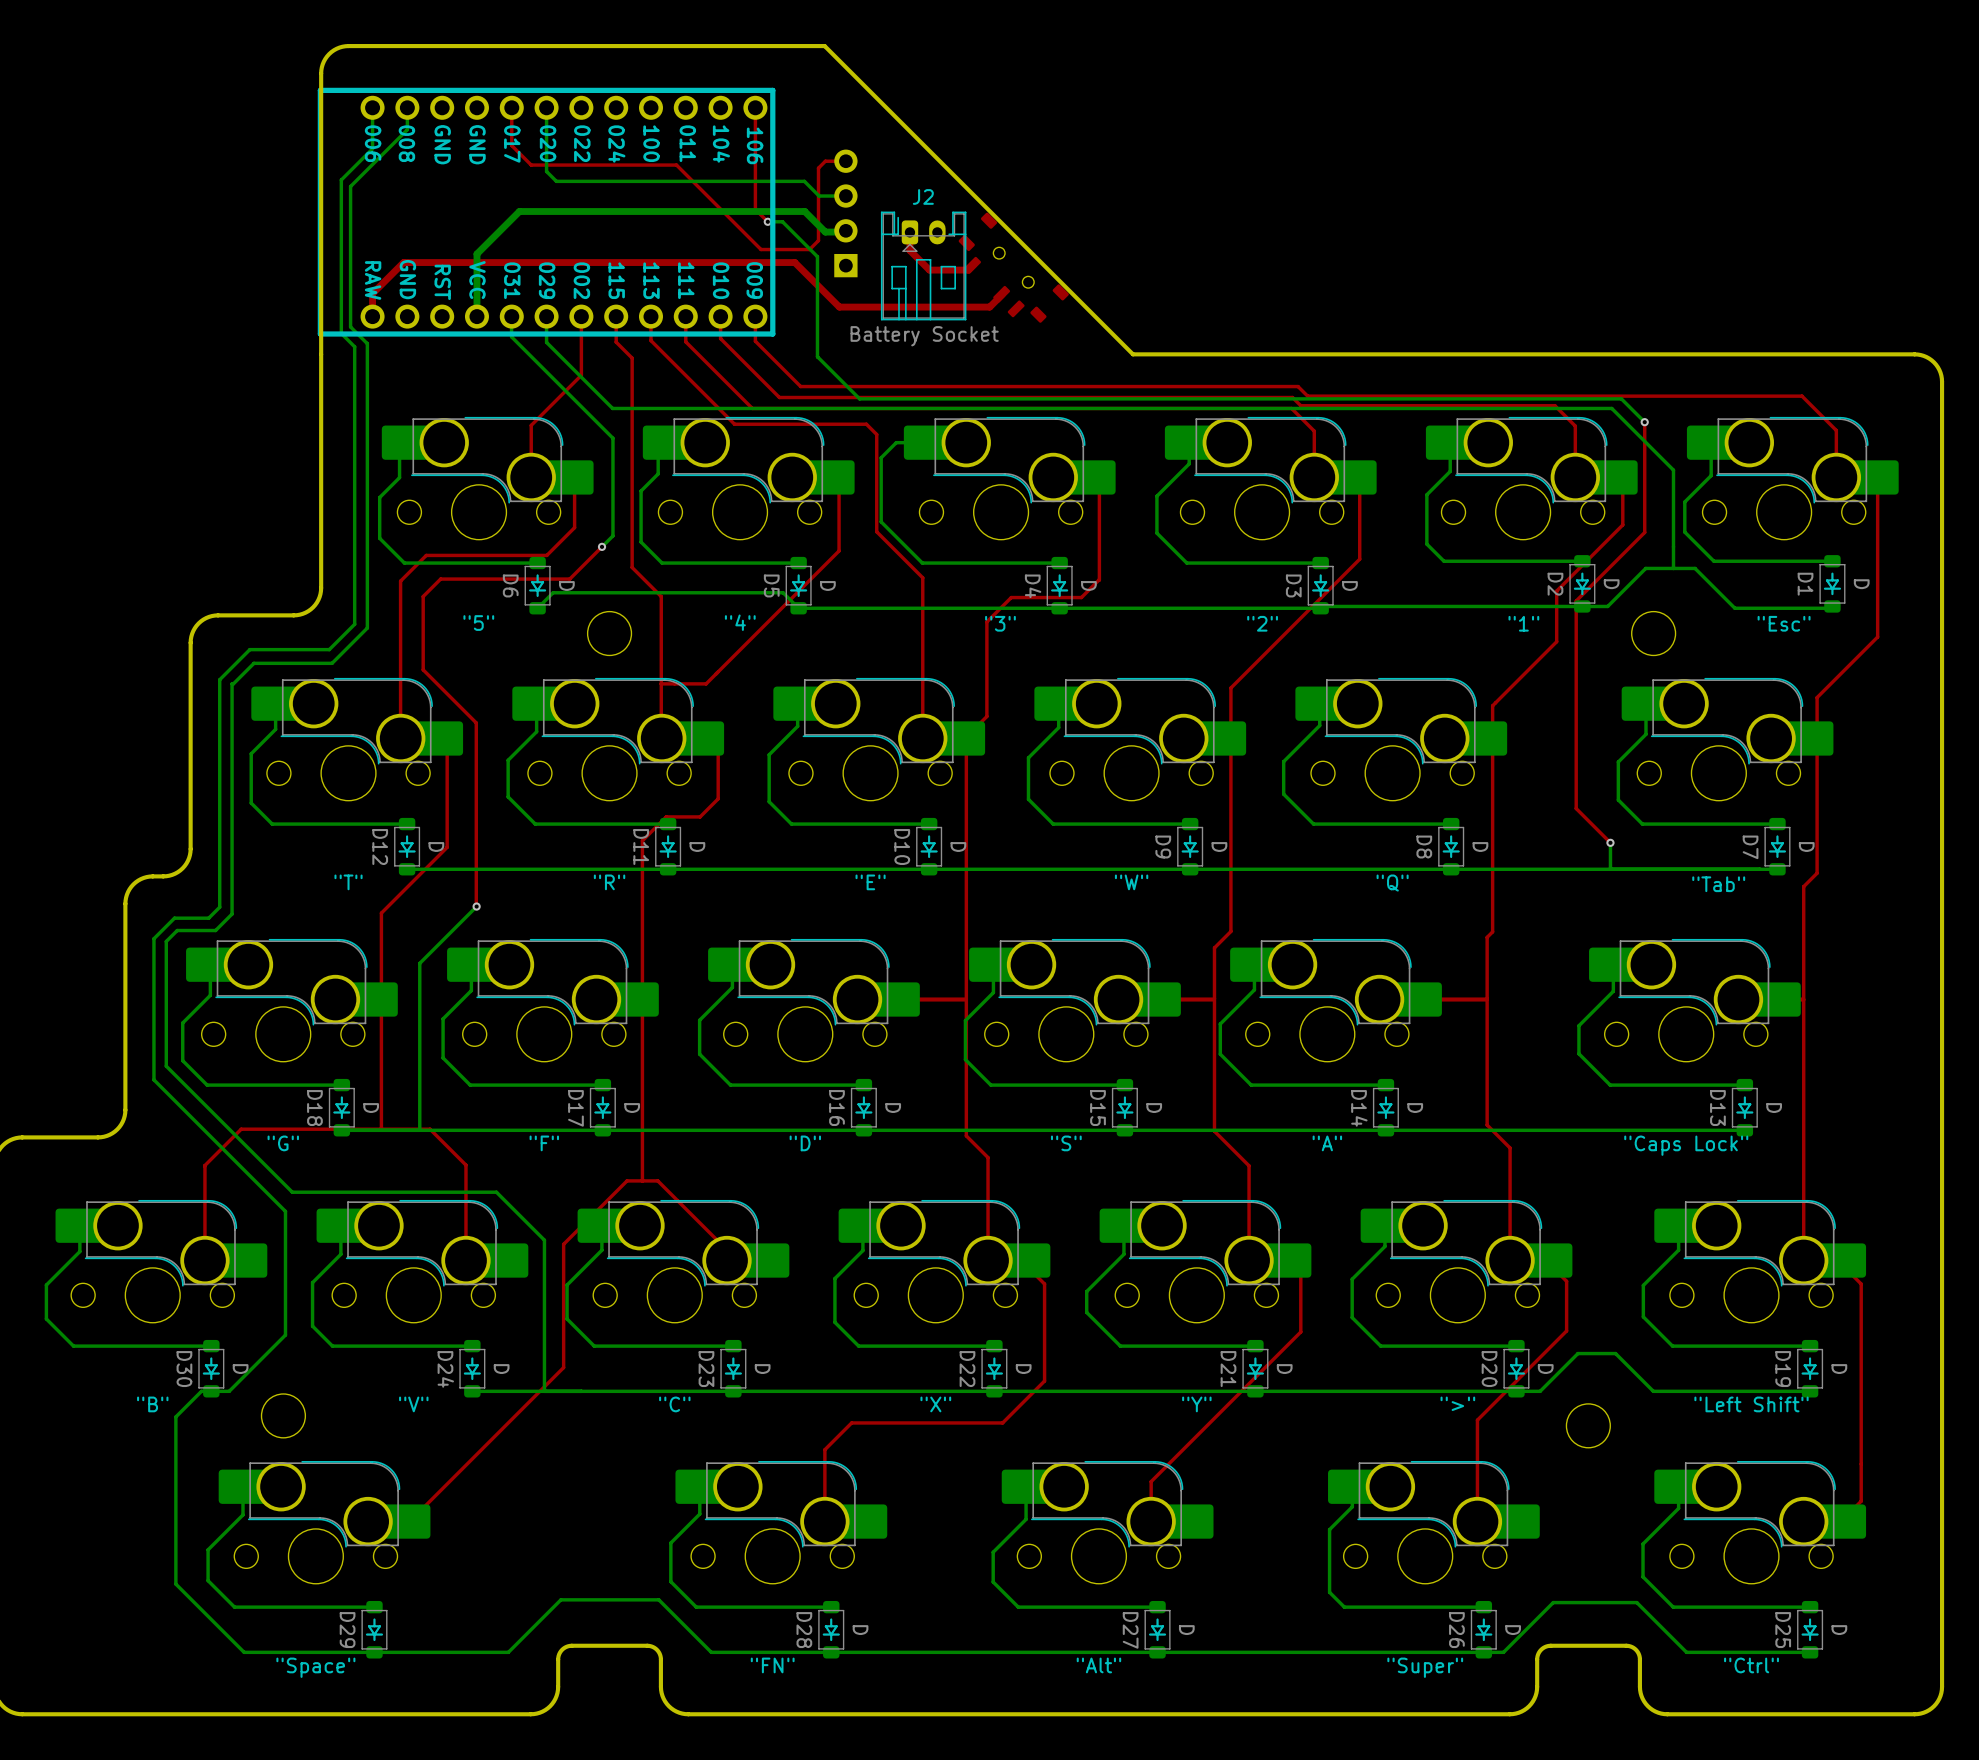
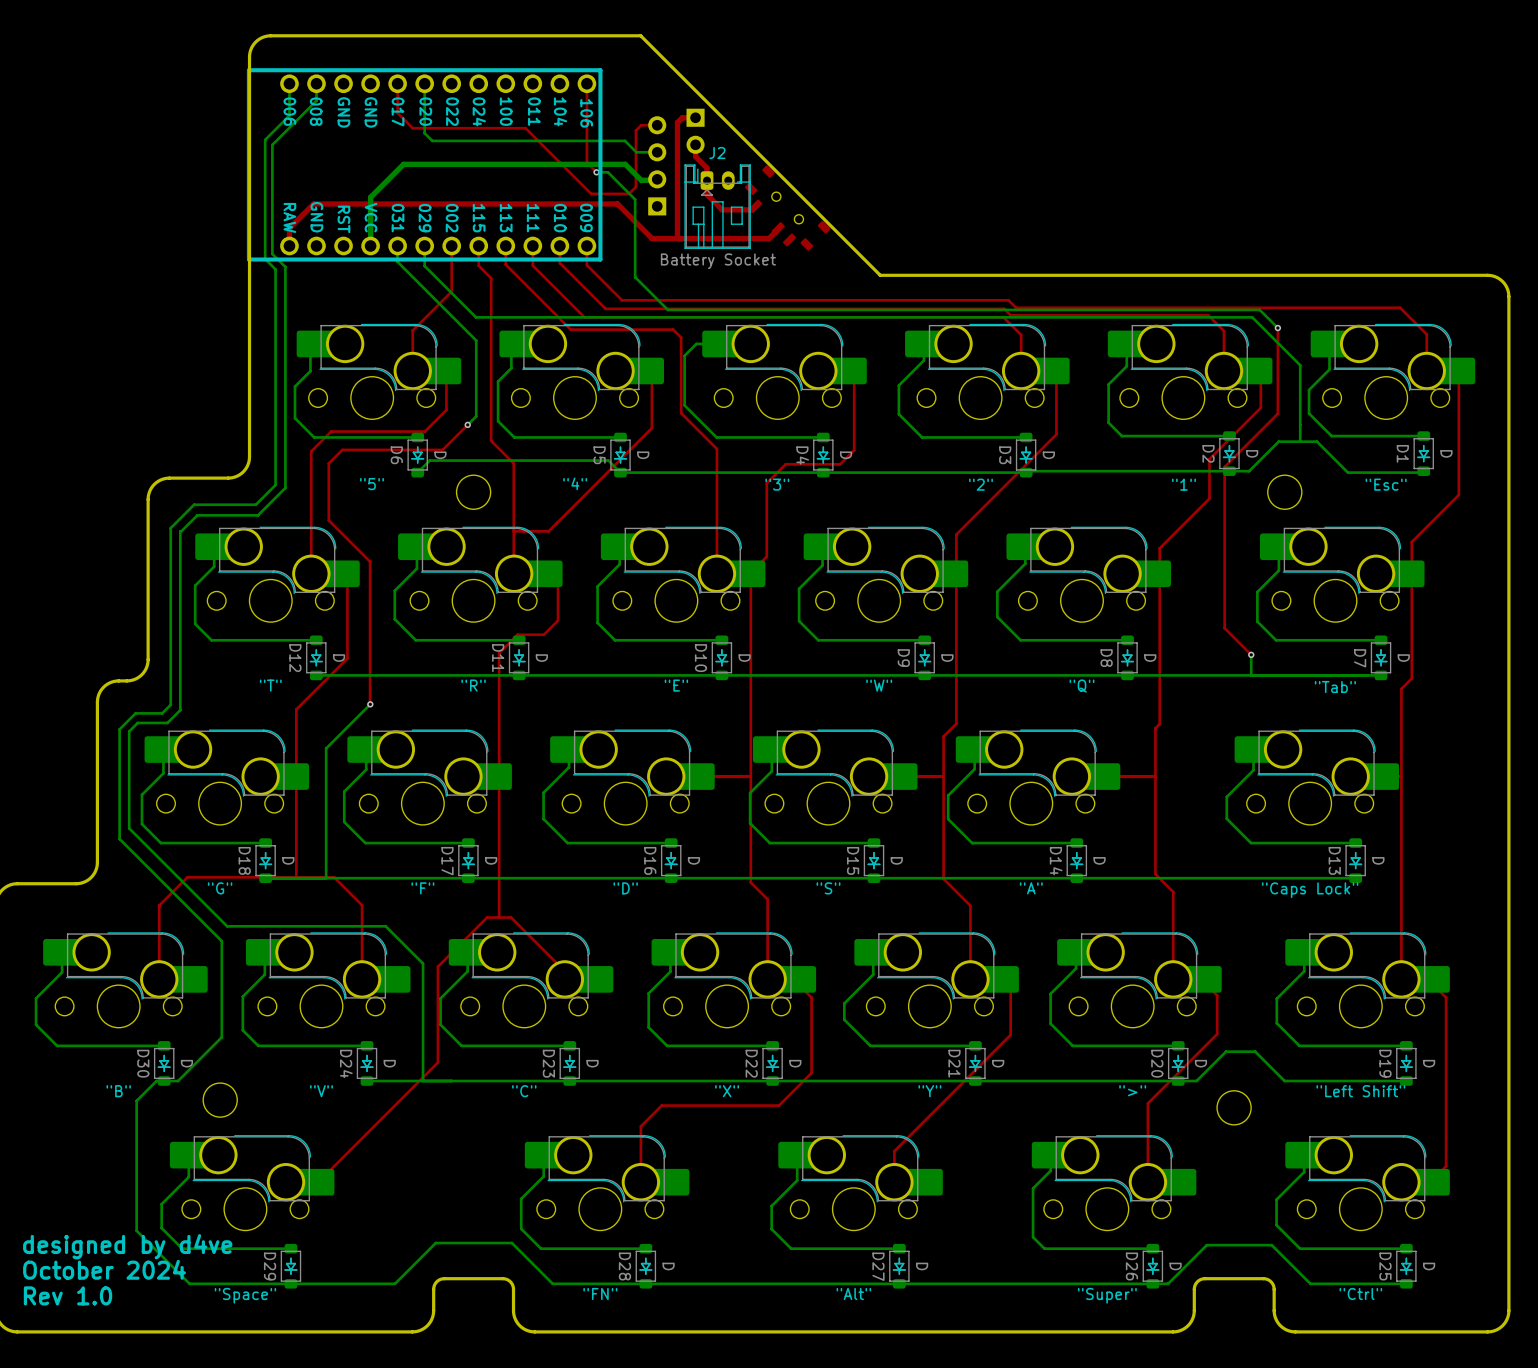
top track: none -> (695, 117) (682, 117) (677, 122) (677, 238)
part: none -> (695, 131)
top track: none -> (695, 144) (695, 156) (707, 168) (707, 180)
text: none -> designed by d4ve (127, 1246)
text: none -> October 2024 (104, 1269)
text: none -> Rev 1.0 (68, 1295)

